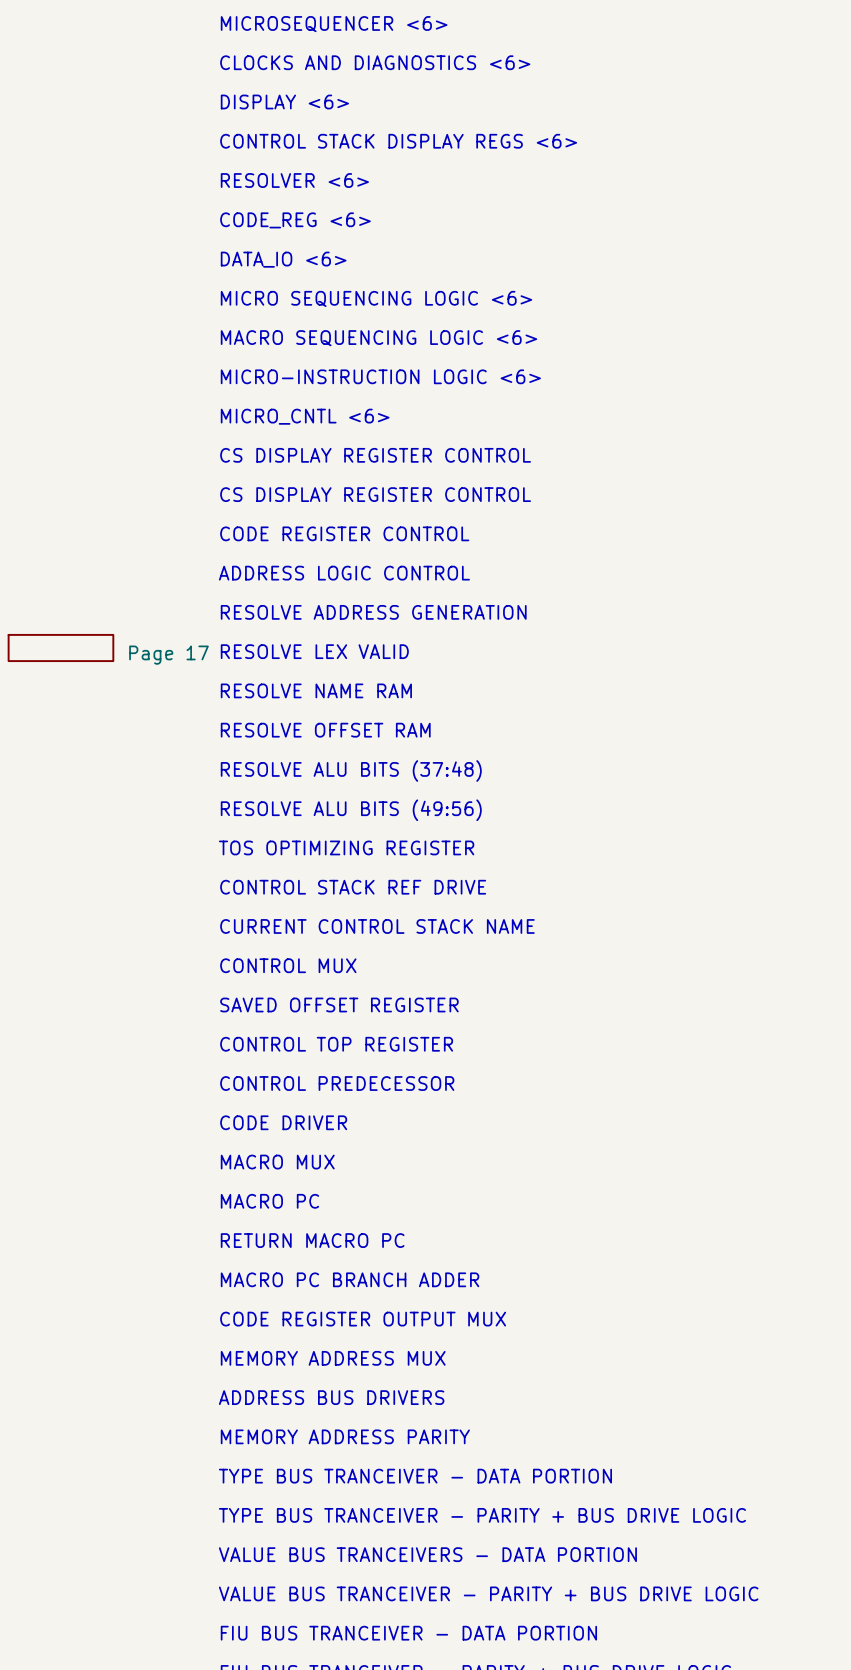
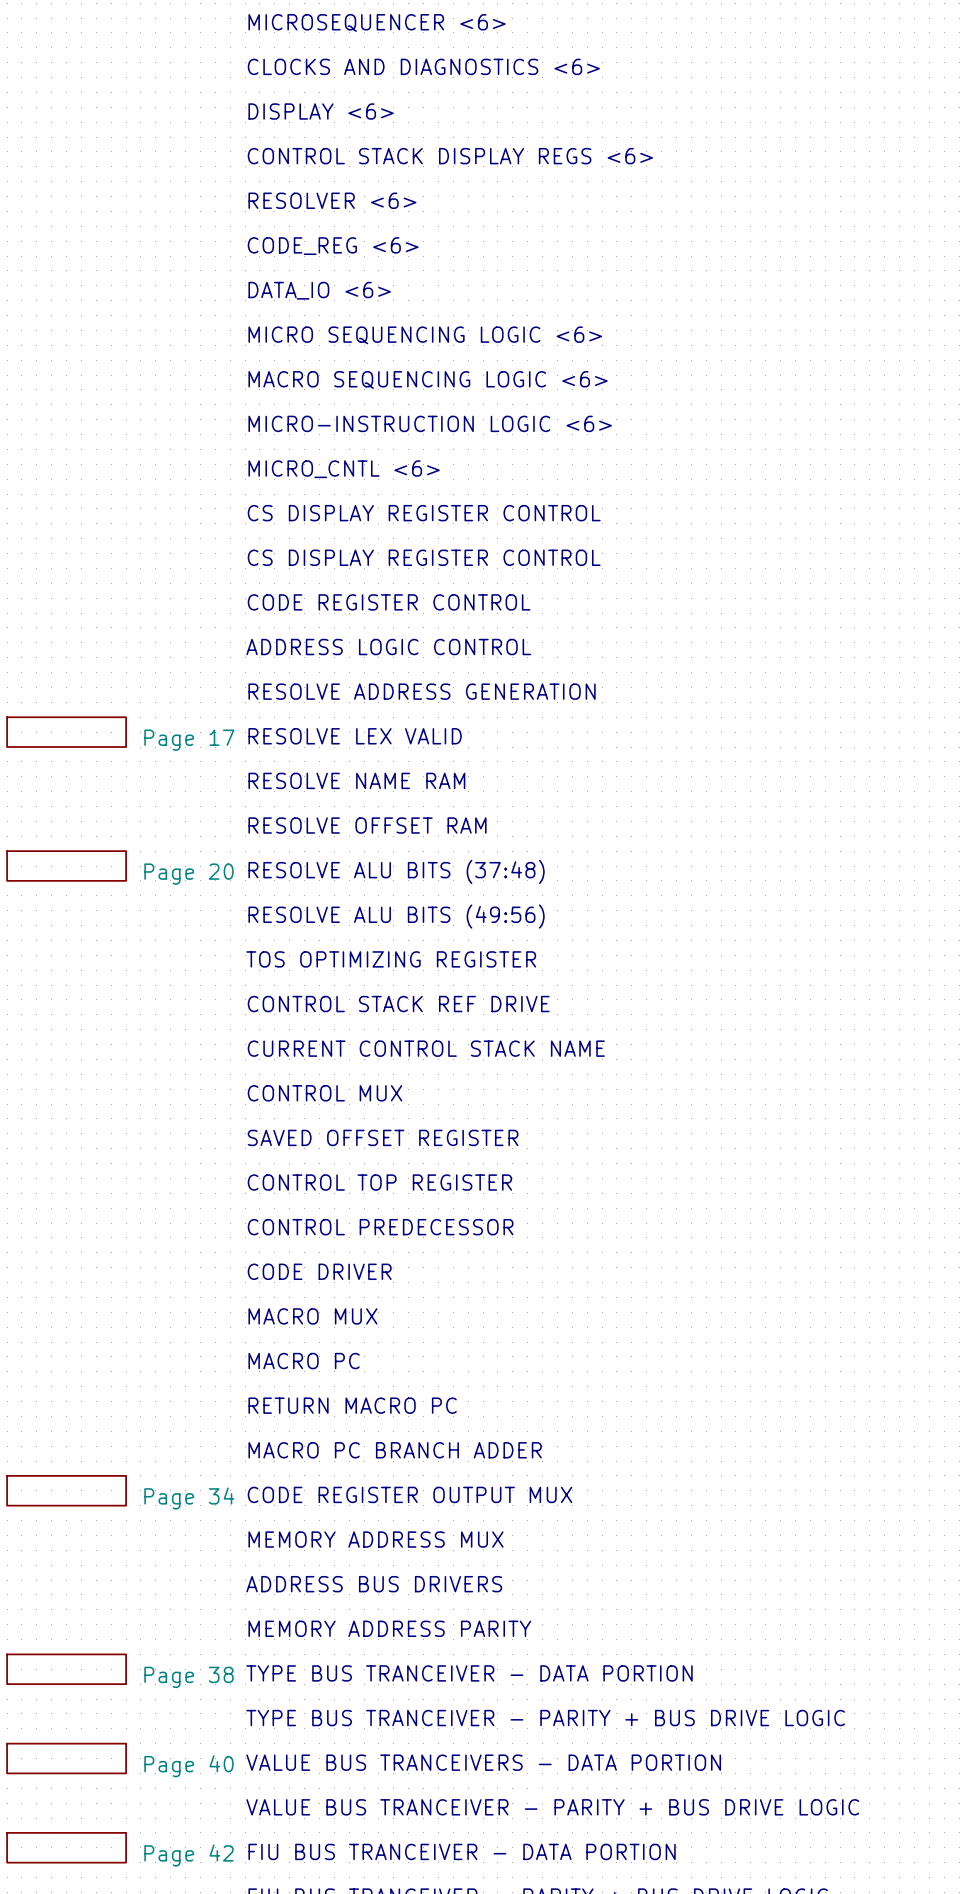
sheet Page 20: none -> (66, 866)
sheet Page 34: none -> (66, 1490)
sheet Page 38: none -> (66, 1669)
sheet Page 40: none -> (66, 1758)
sheet Page 42: none -> (66, 1847)

